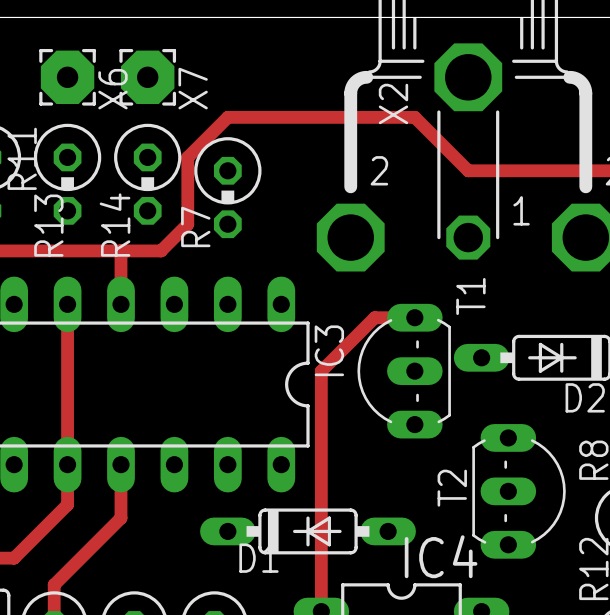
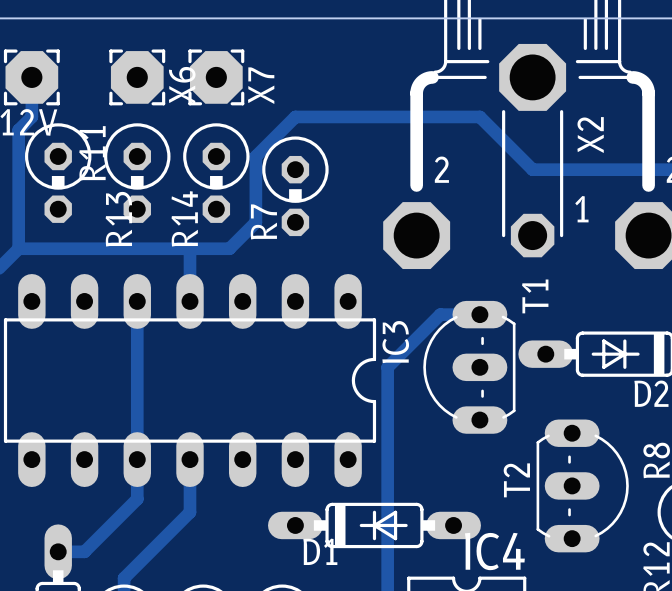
X2 name position: X2 (393, 103) -> X2 (590, 135)

